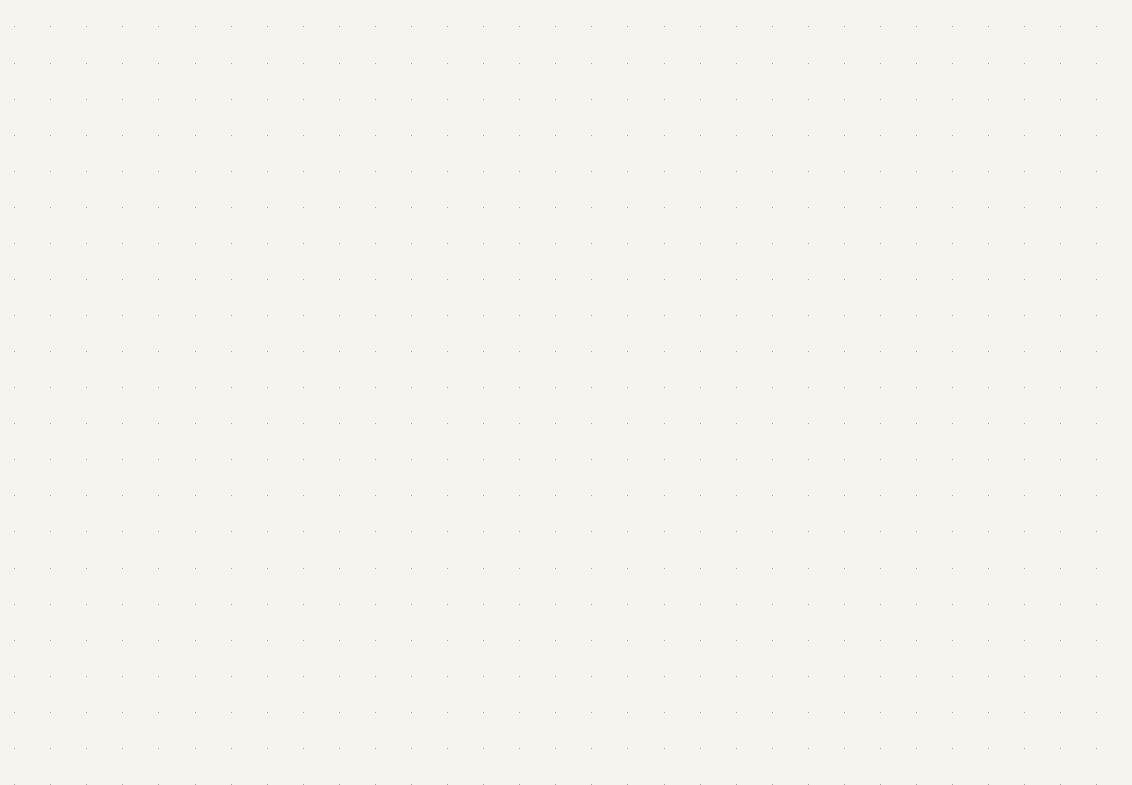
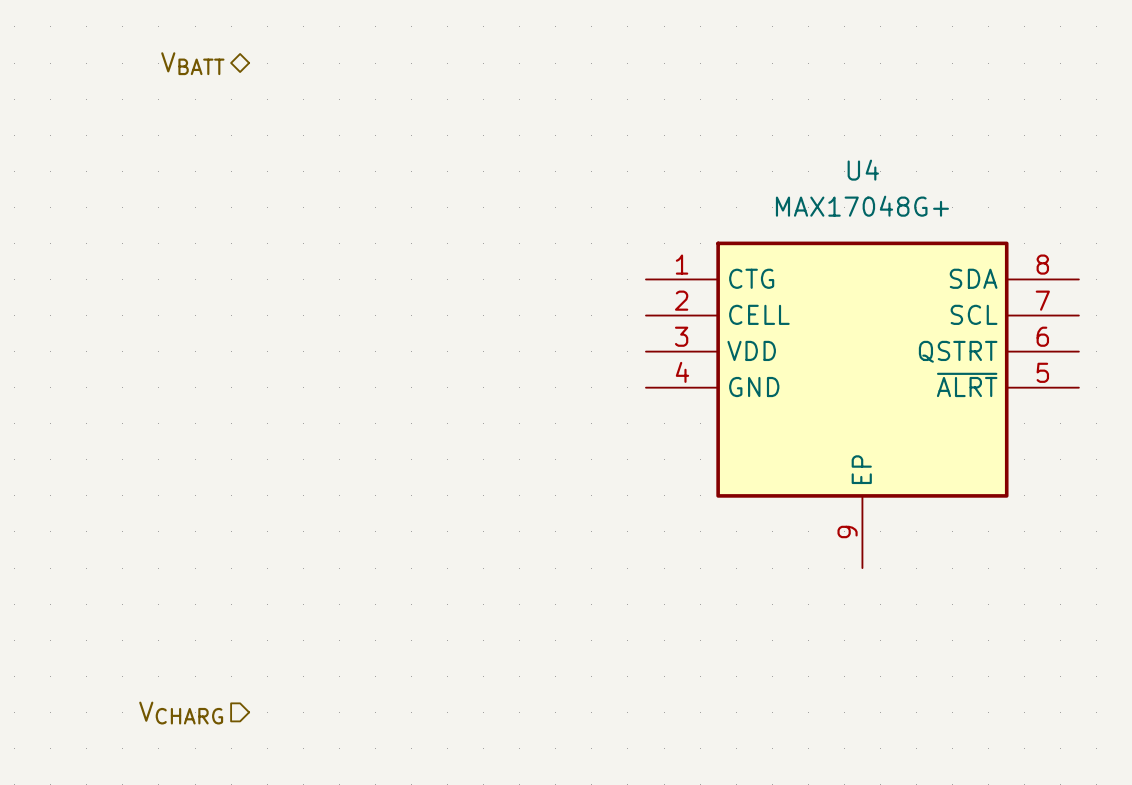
hierarchical label: none -> VBATT (192, 63)
U4: none -> MAX17048G+ (862, 404)
hierarchical label: none -> VCHARG (181, 713)

